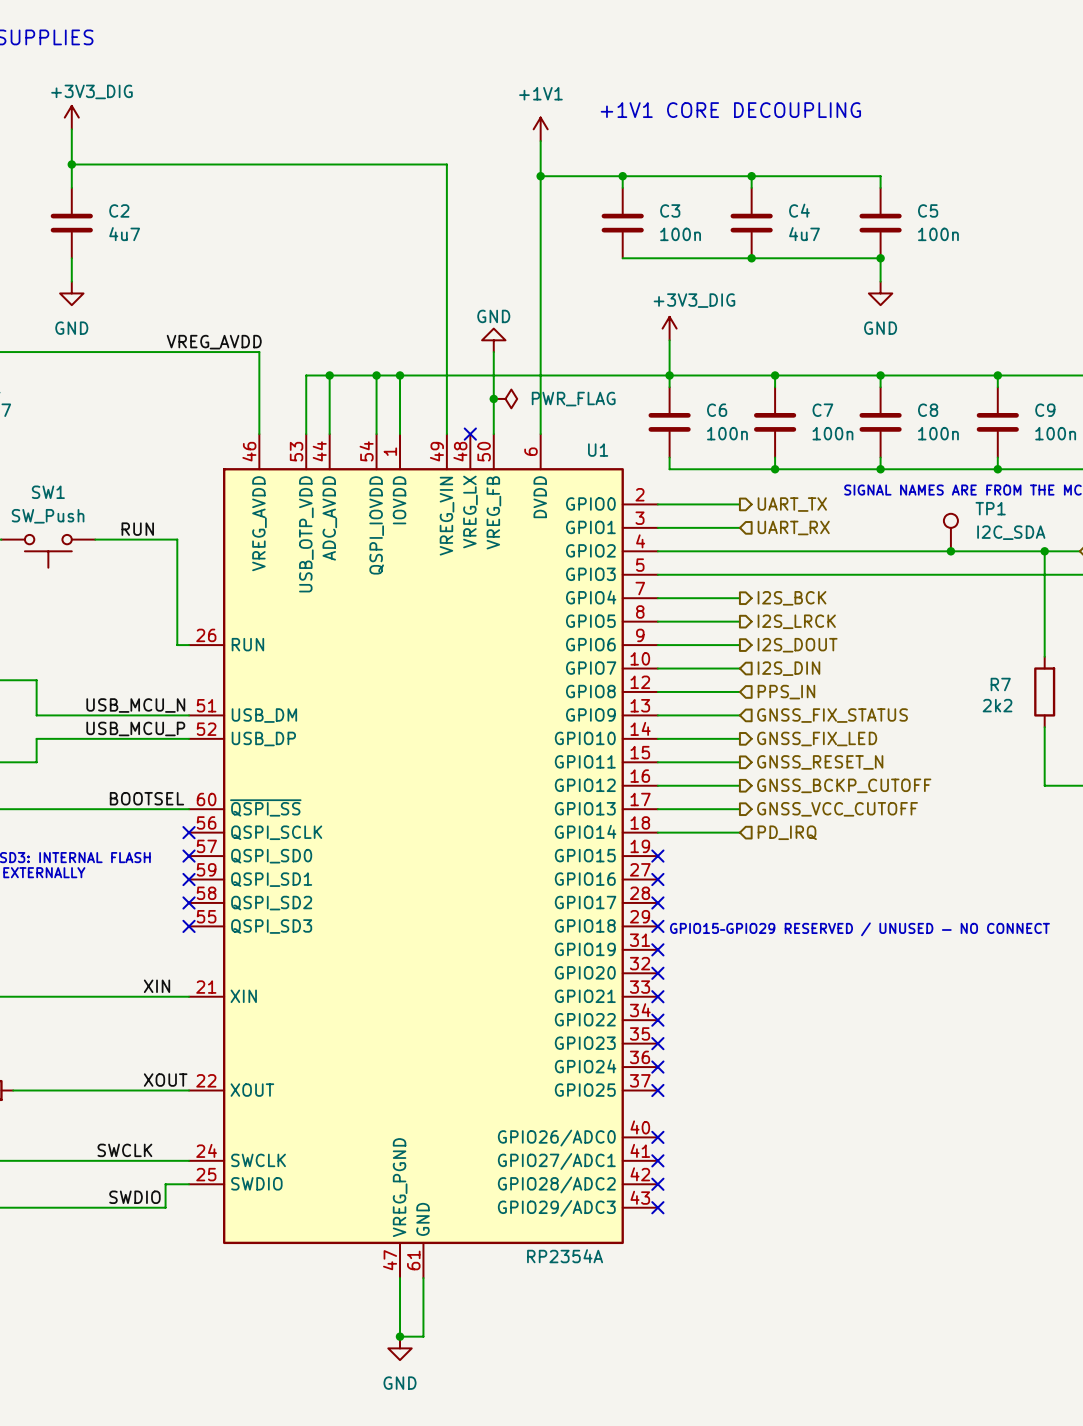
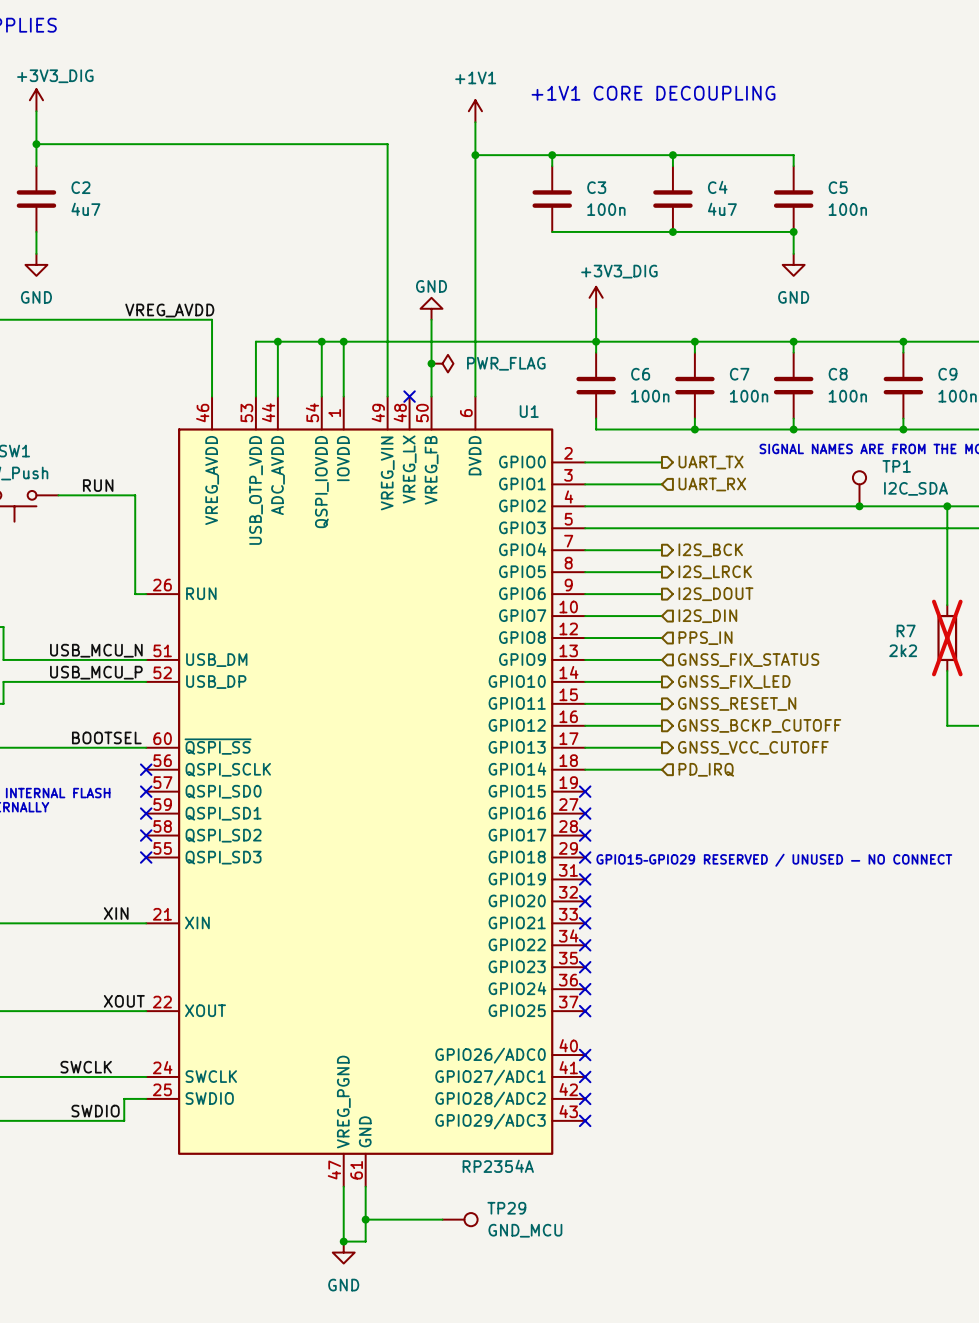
R7 do-not-place cross: none -> (947, 638)
wire: none -> (365, 1219) (442, 1219)
junction: none -> (365, 1219)
TP29: none -> GND_MCU (460, 1219)

